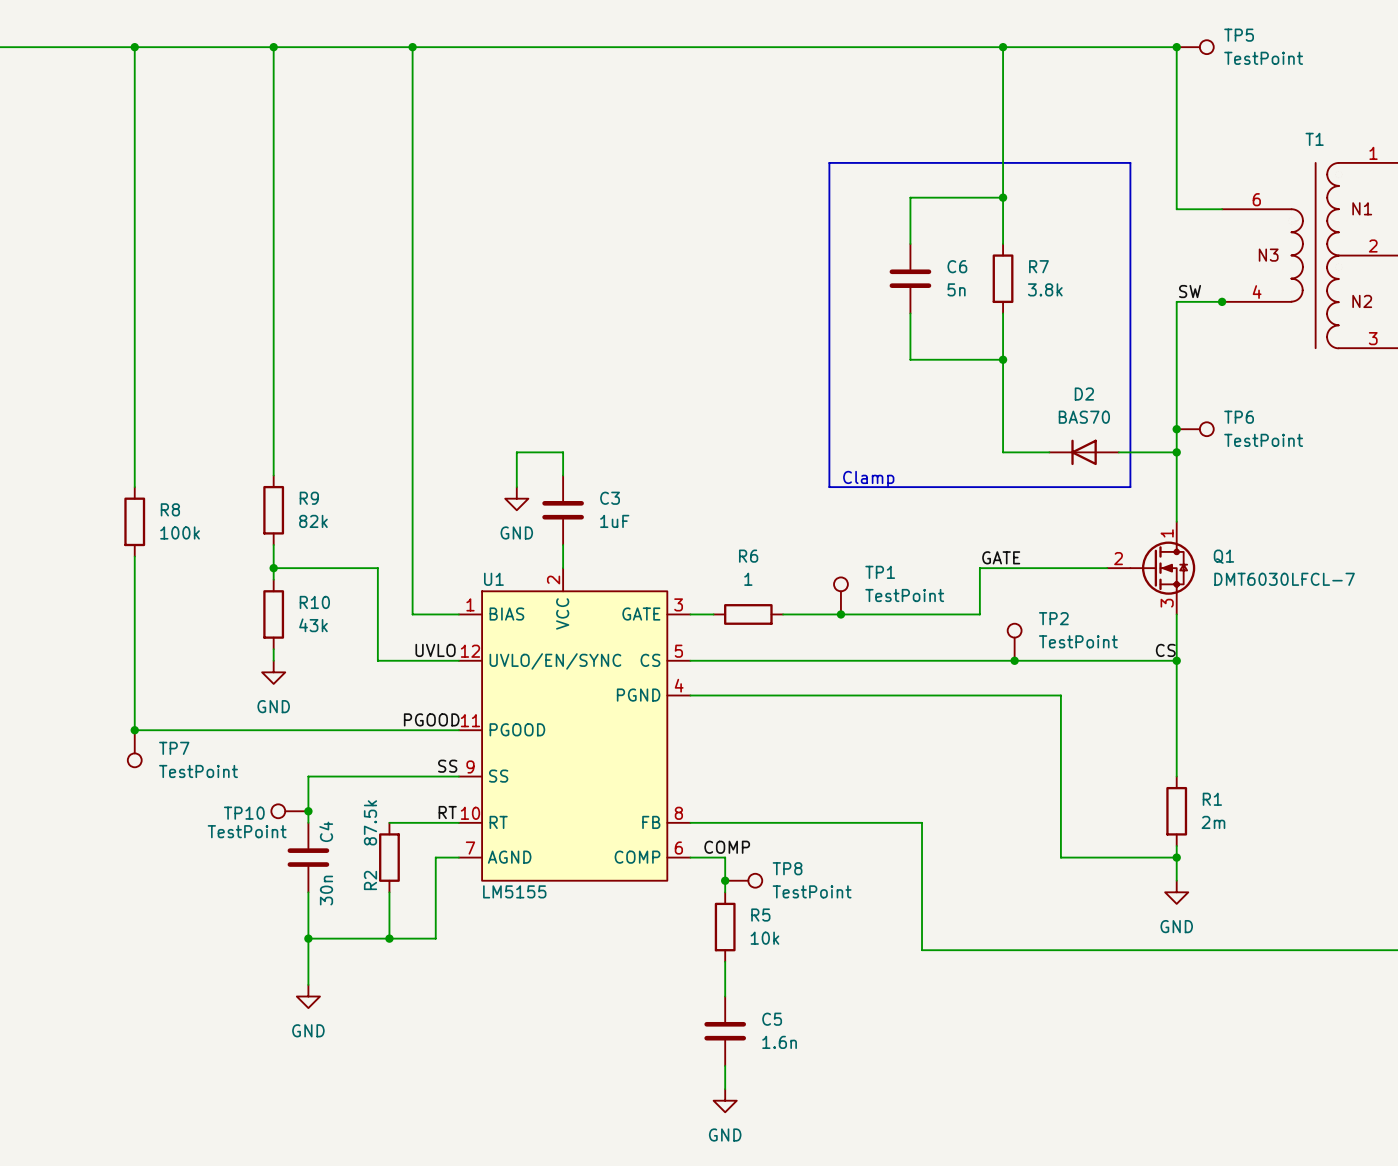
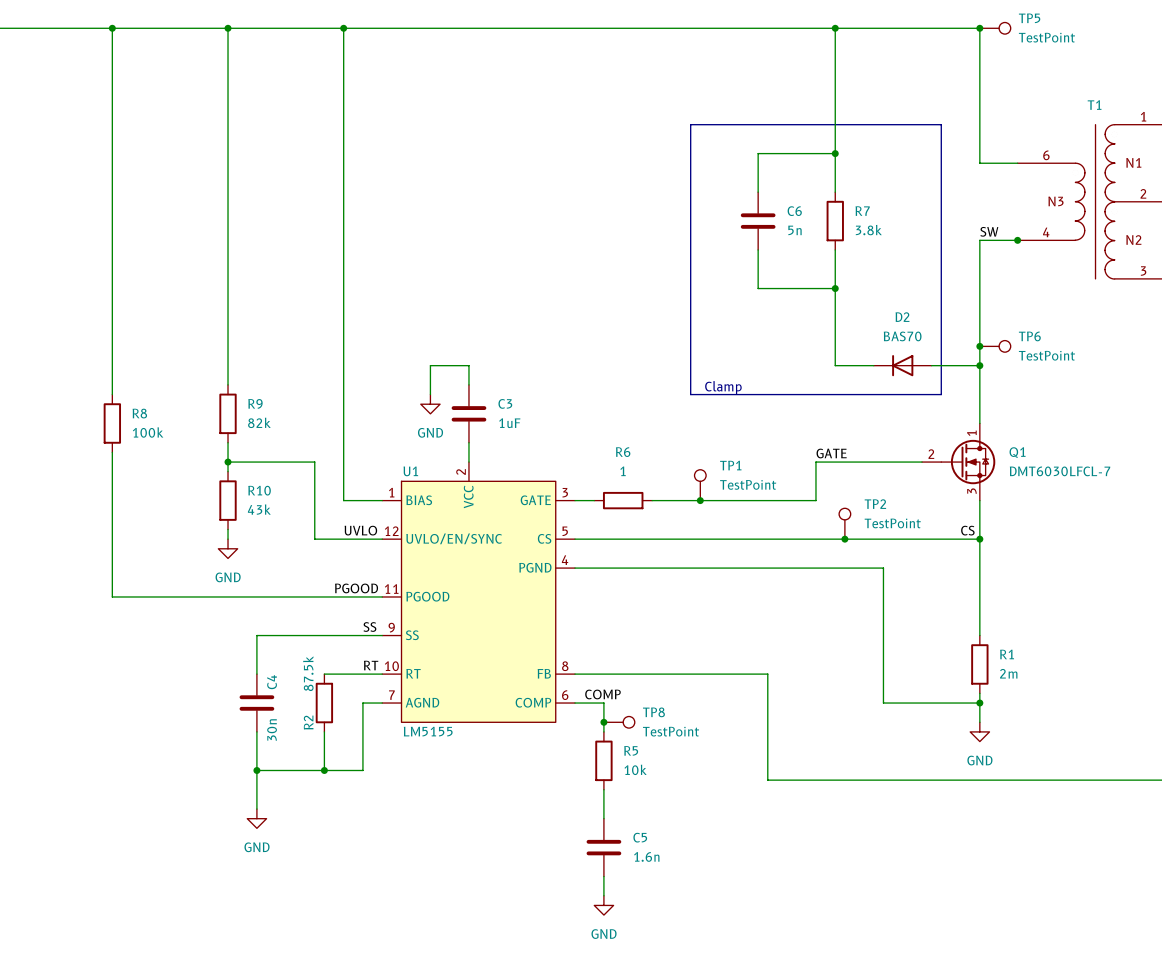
junction: (134, 730) -> none
TP7: TestPoint (134, 748) -> none
TP10: TestPoint (289, 811) -> none
junction: (308, 811) -> none

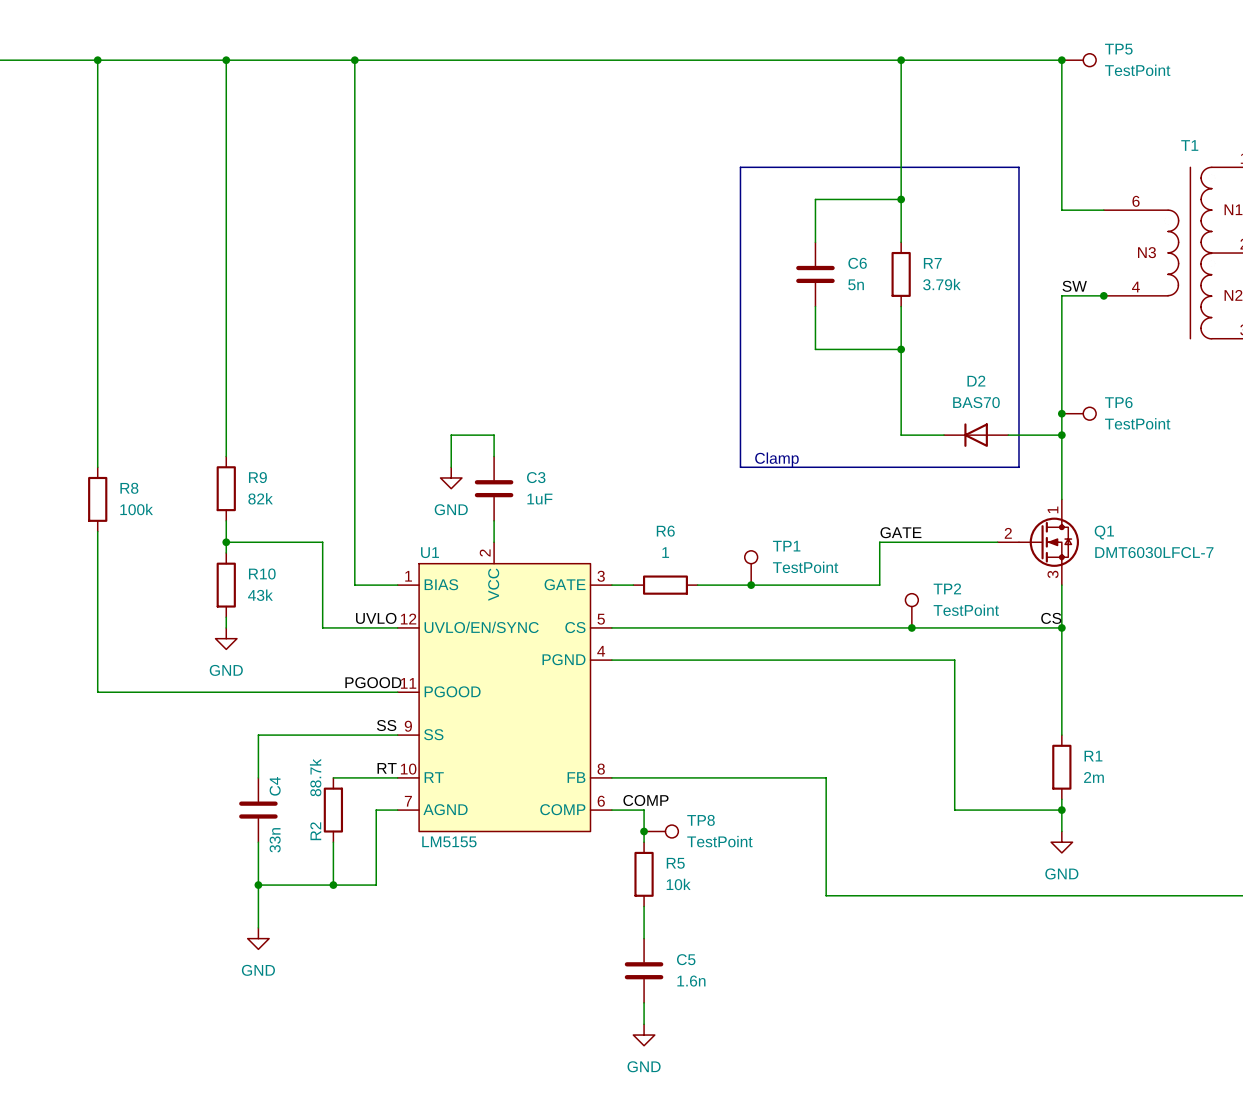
R7 value: 3.8k (868, 230) -> 3.79k (941, 284)
R2 value: 87.5k (308, 673) -> 88.7k (315, 777)
C4 value: 30n (272, 730) -> 33n (275, 840)

